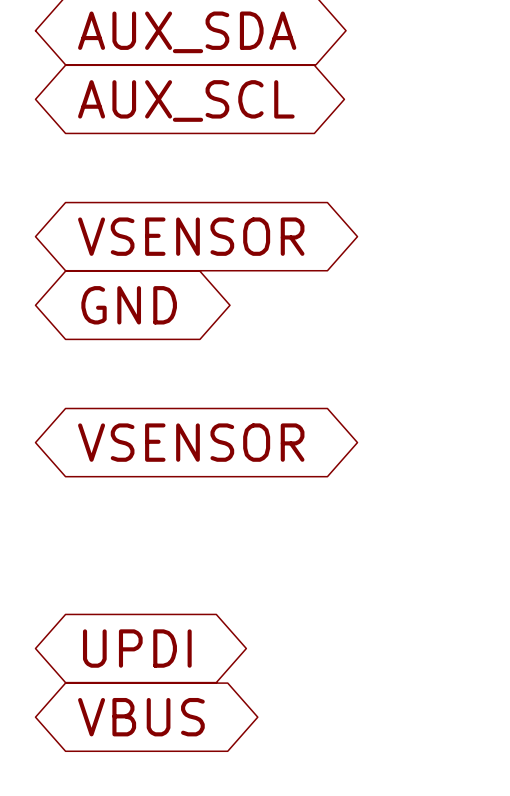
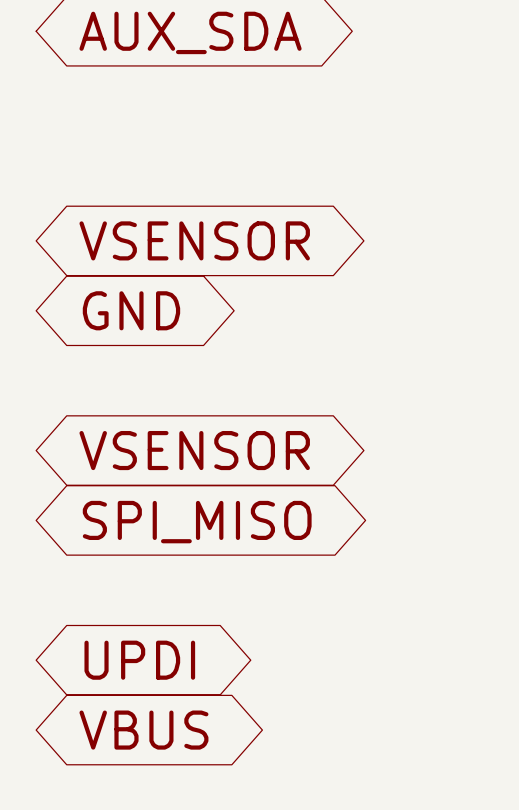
global label: AUX_SCL (186, 100) -> none
global label: none -> SPI_MISO (197, 522)

